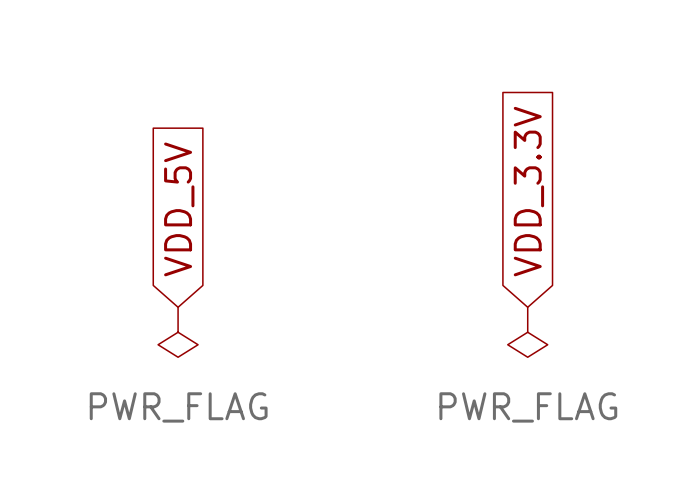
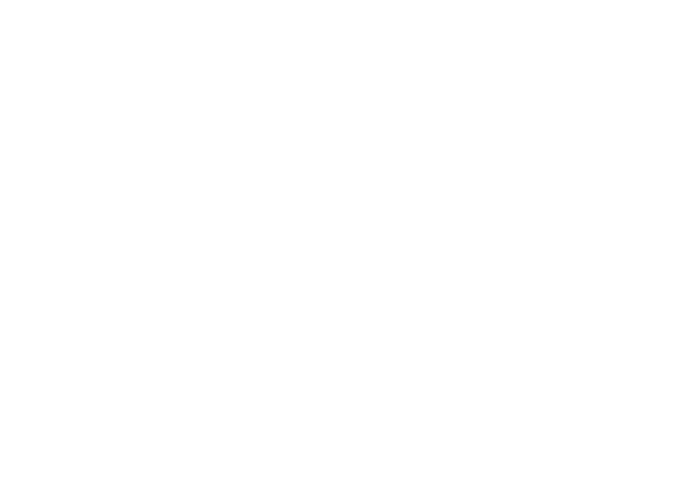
global label: VDD_3.3V (528, 191) -> none
global label: VDD_5V (179, 209) -> none
power symbol: PWR_FLAG (178, 332) -> none
power symbol: PWR_FLAG (527, 332) -> none

